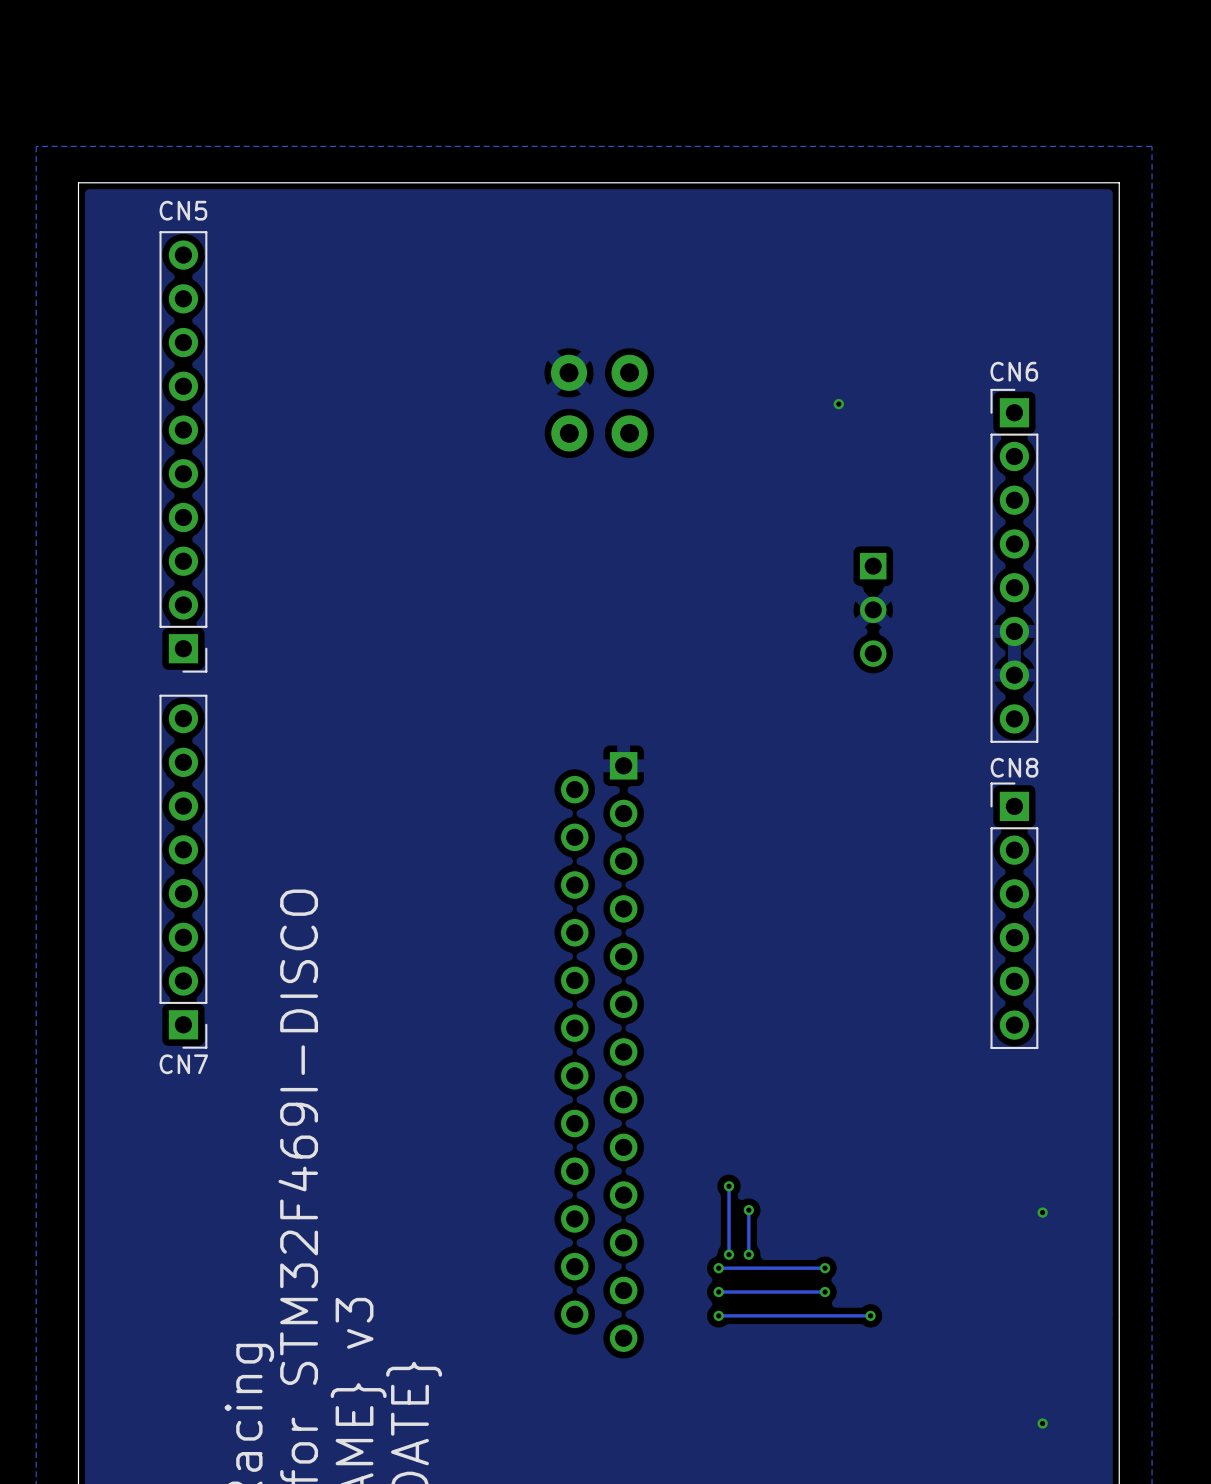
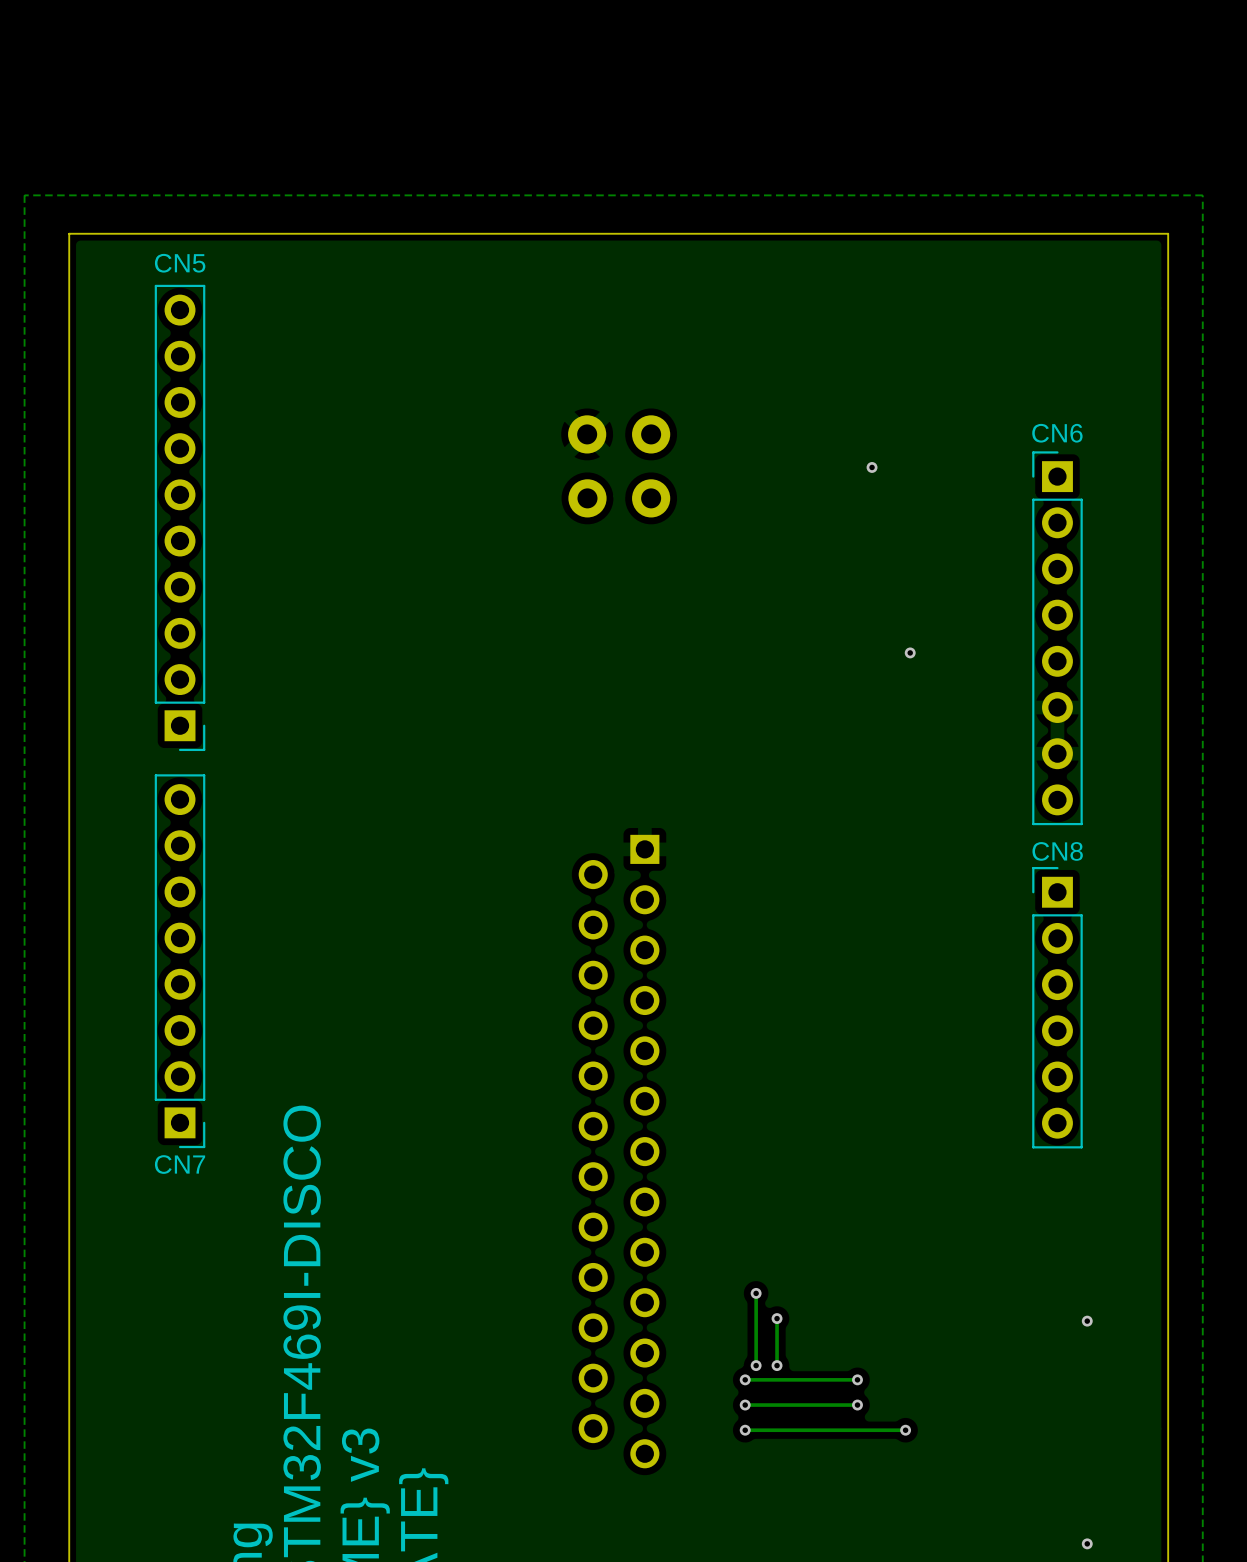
via: none -> (910, 652)
part: (873, 609) -> none

